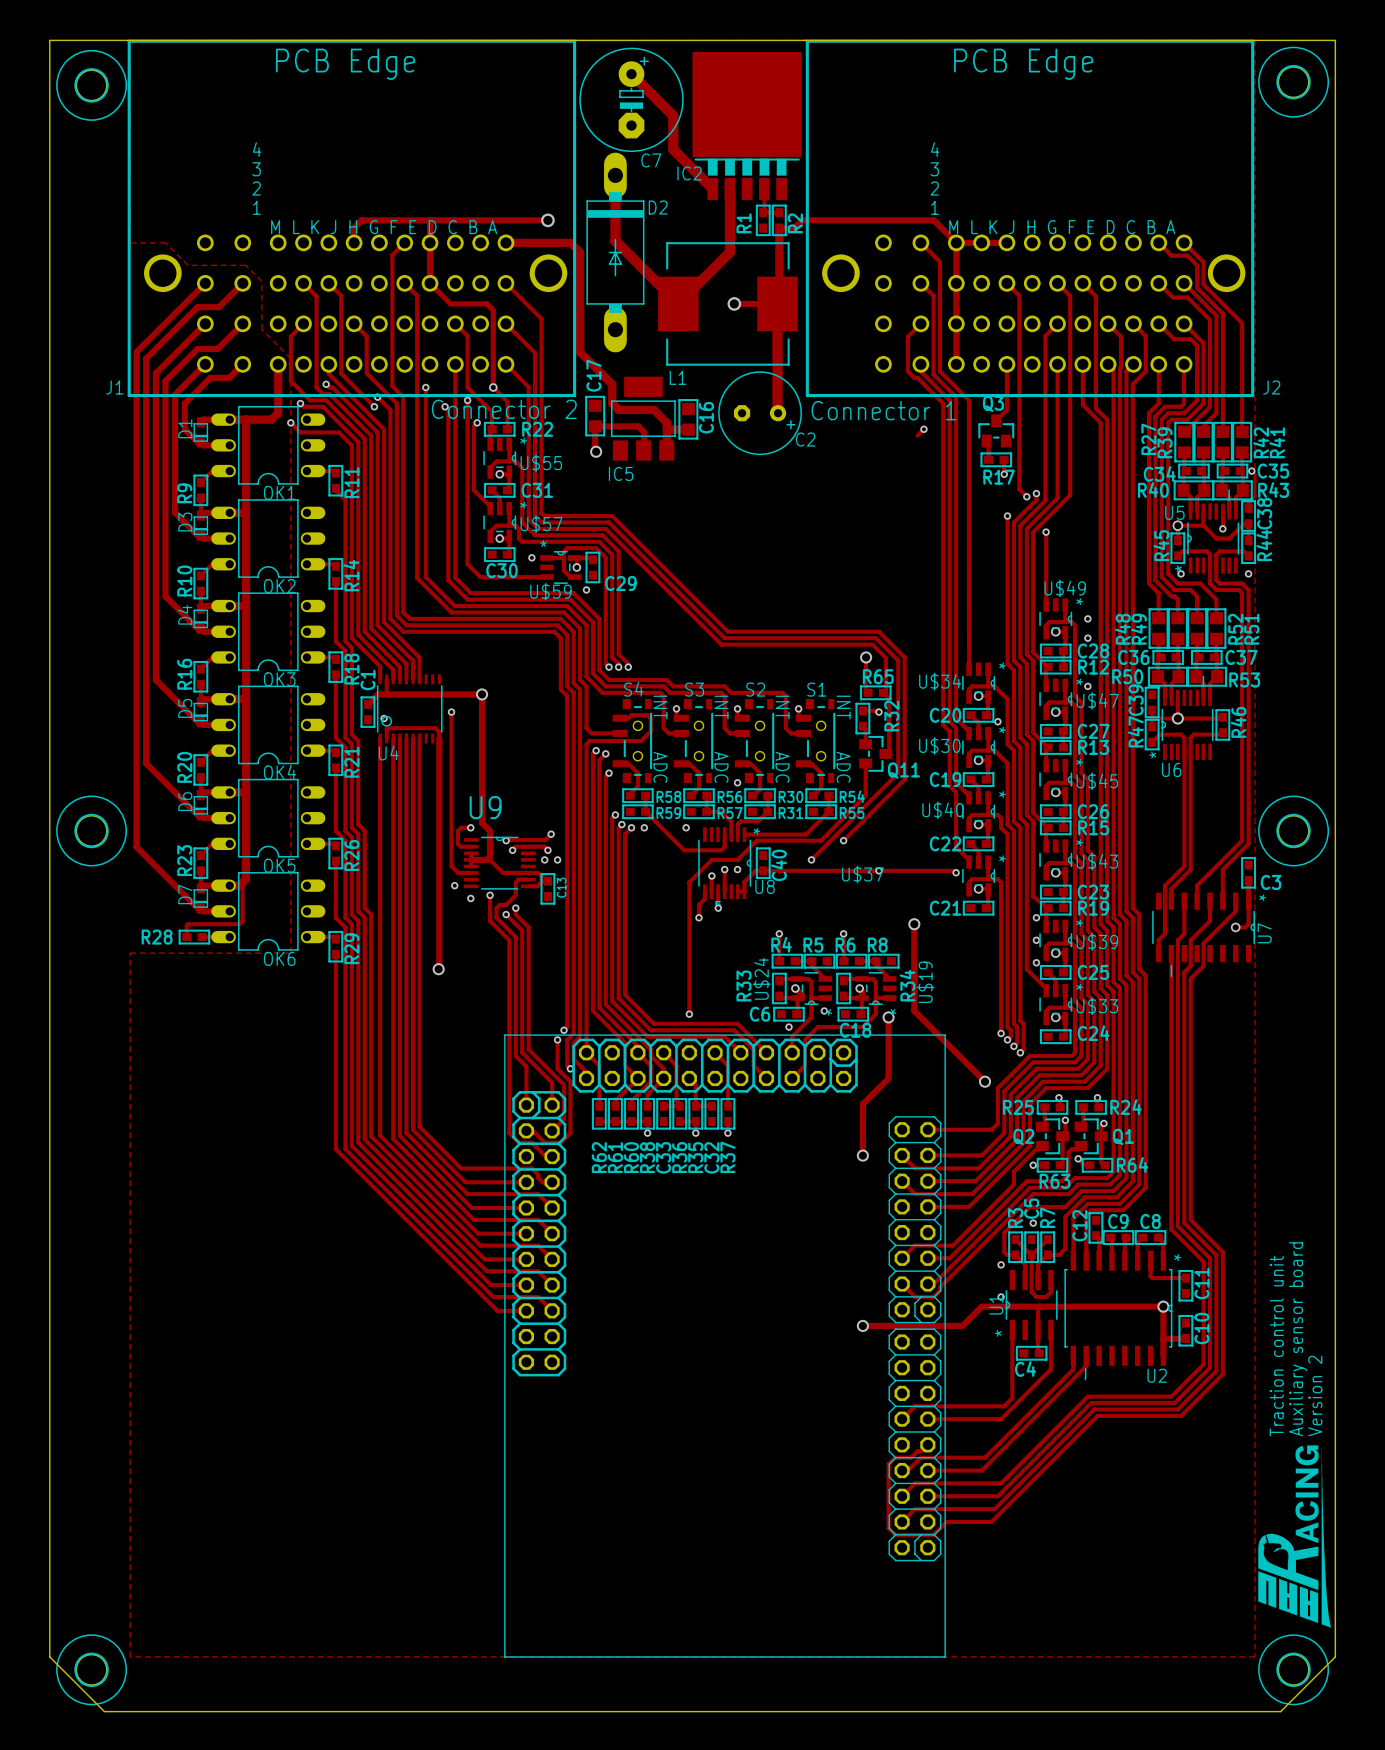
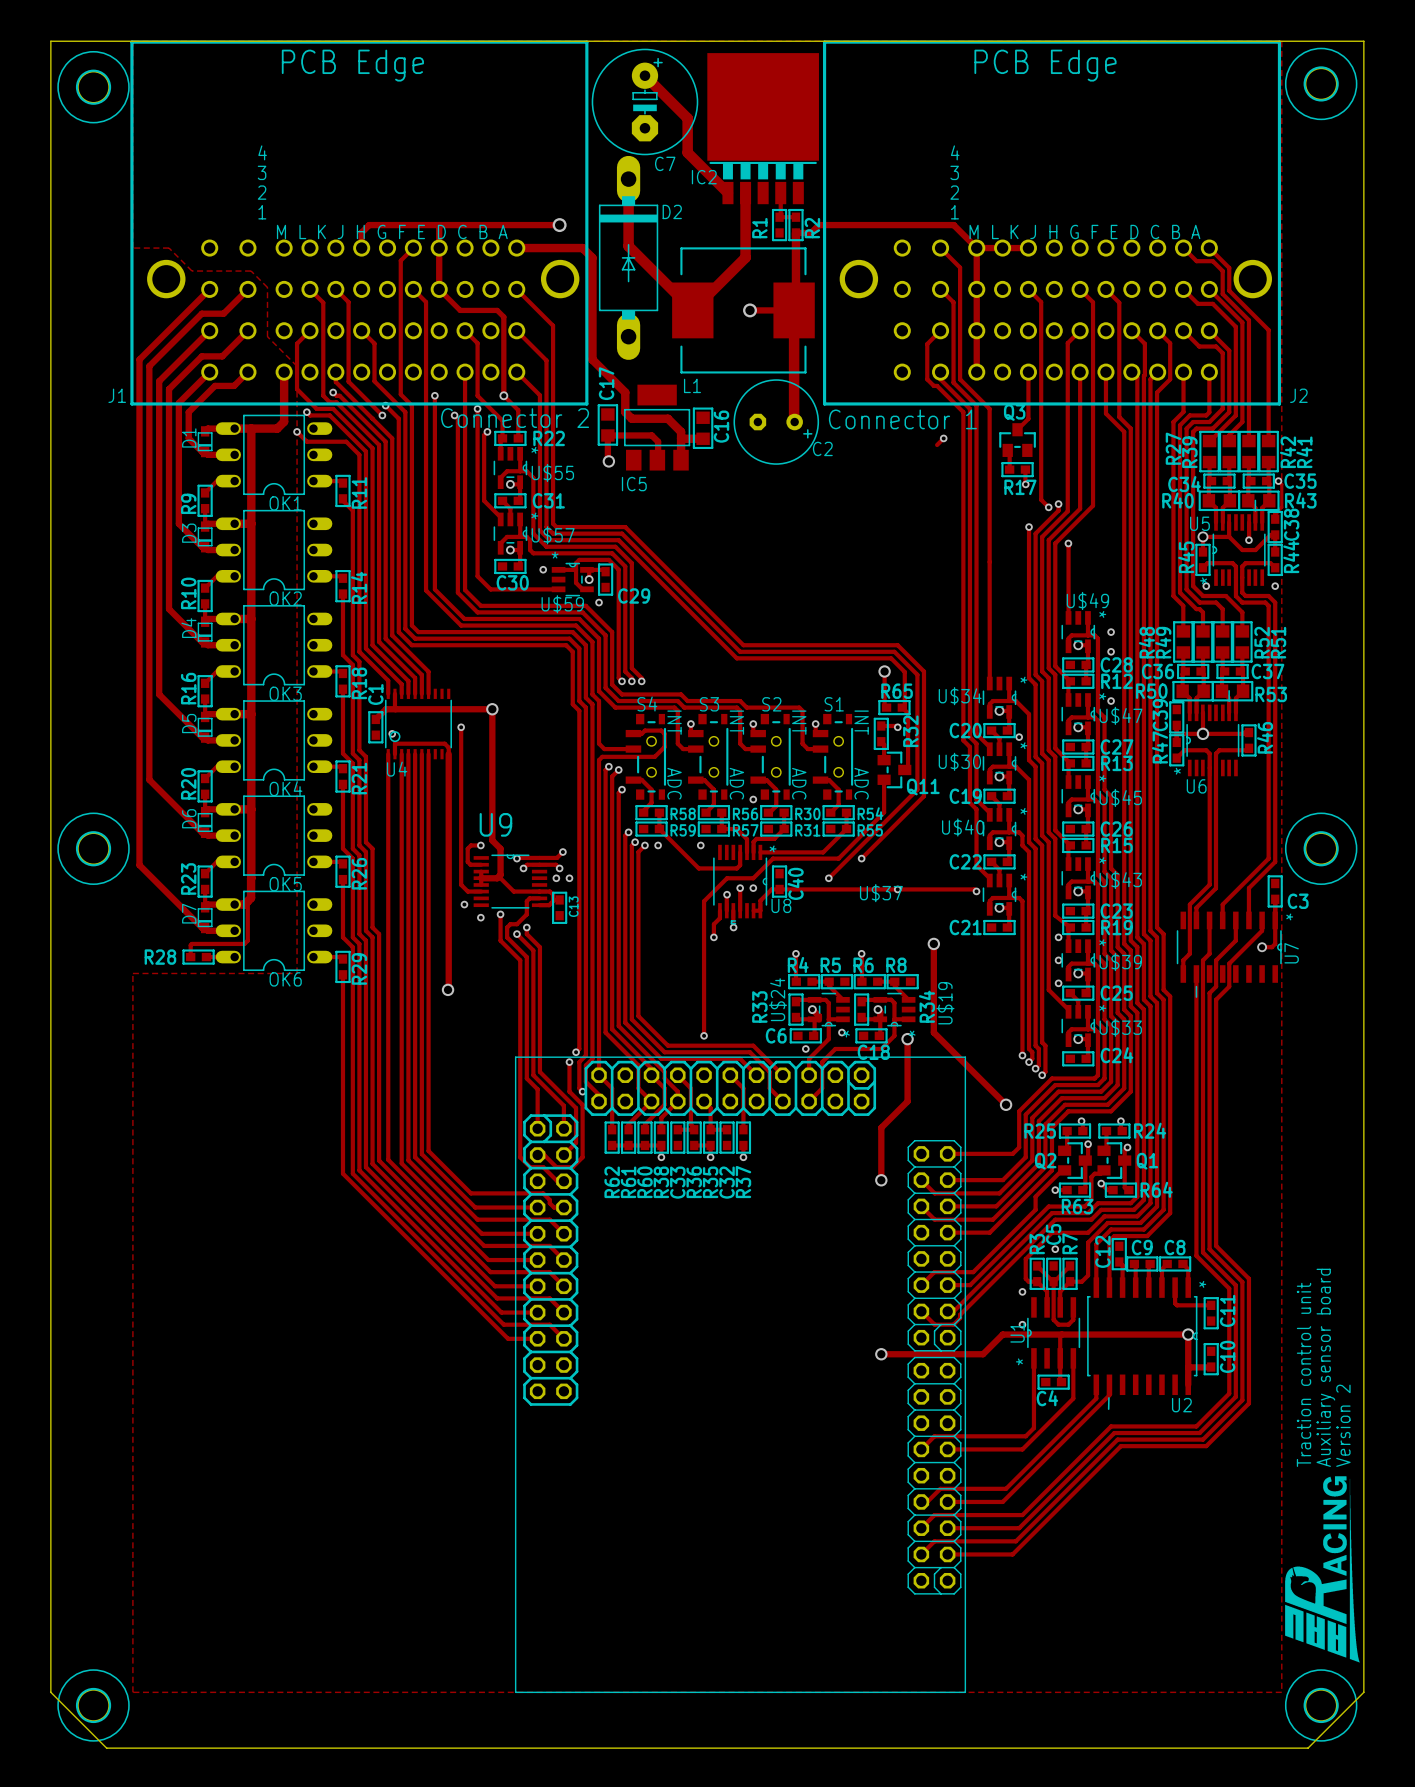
track: (927, 1444) (911, 1457) (895, 1457) (888, 1464) (888, 1528) (895, 1534) (933, 1534) (946, 1521) -> (947, 1554) (966, 1554)

